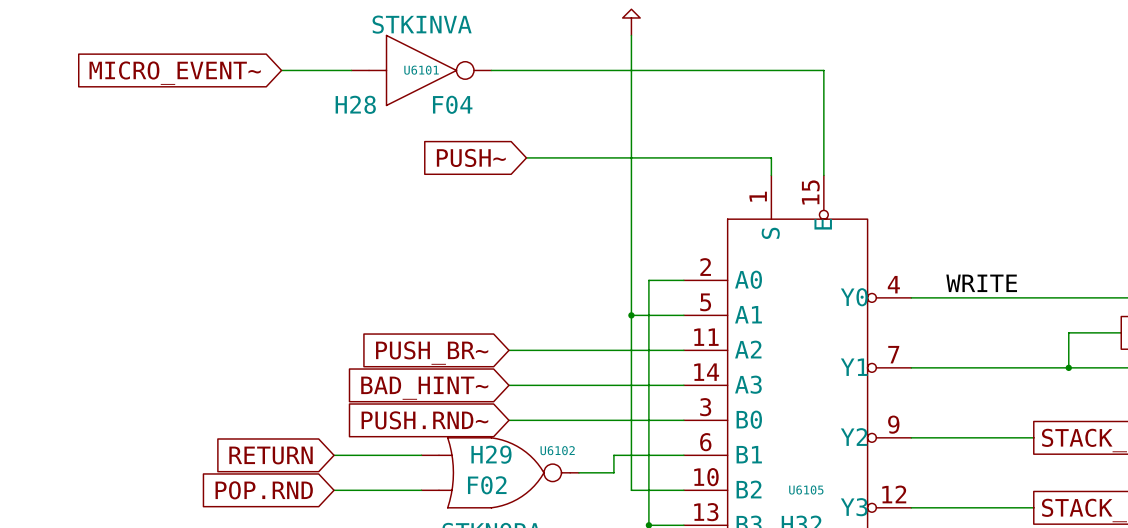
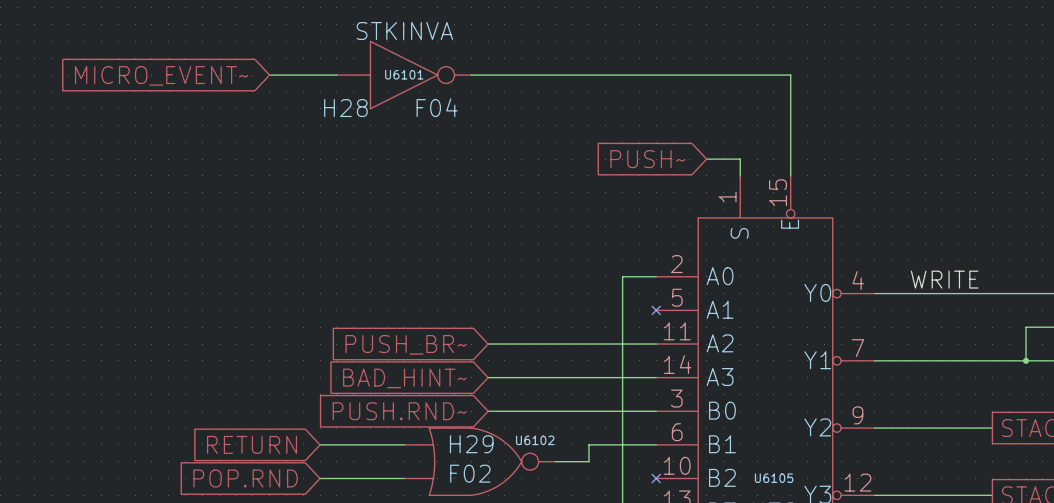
power symbol: (631, 22) -> none
wire: (631, 35) (631, 490) (683, 490) -> none
global label: PUSH~ (471, 157) -> none
wire: (526, 157) (736, 157) -> none
global label: none -> PUSH~ (647, 159)
wire: (631, 315) (683, 315) -> none
junction: (631, 315) -> none
no-connect mark: none -> (656, 310)
no-connect mark: none -> (656, 478)

